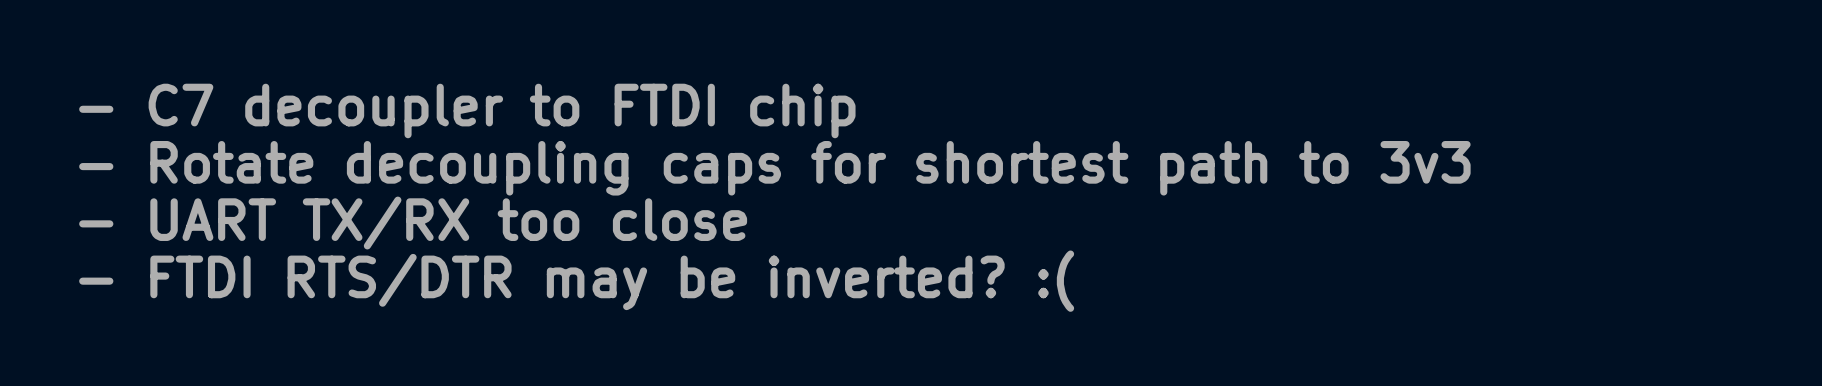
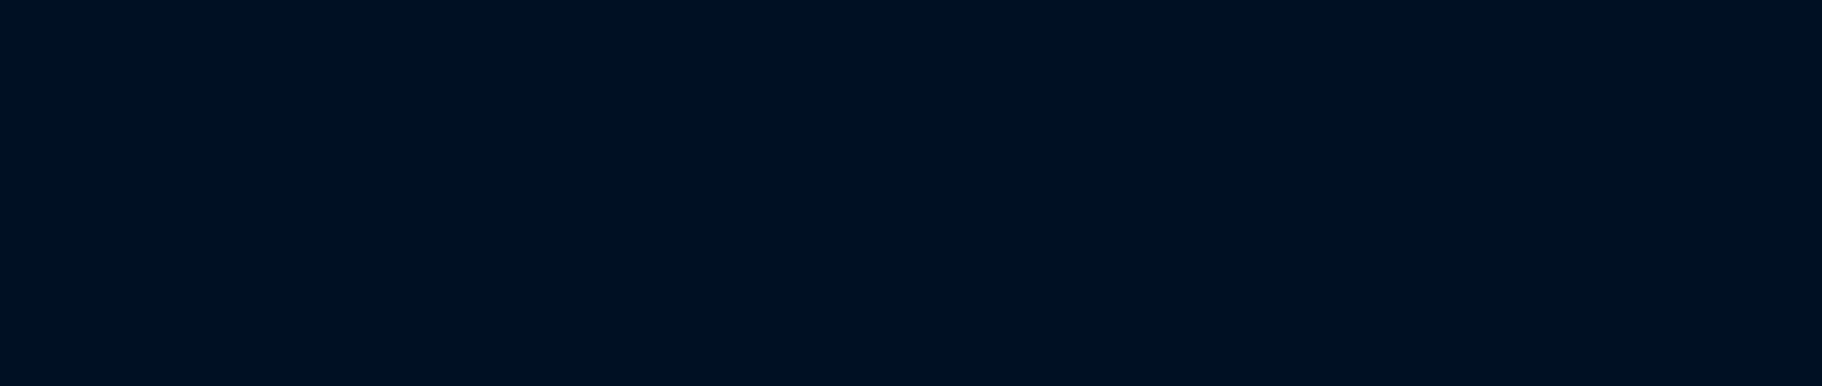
text: - C7 decoupler to FTDI chip (467, 110) -> none
text: - Rotate decoupling caps for shortest path to 3v3 (774, 168) -> none
text: - UART TX/RX too close (413, 223) -> none
text: - FTDI RTS/DTR may be inverted? :( (576, 281) -> none

